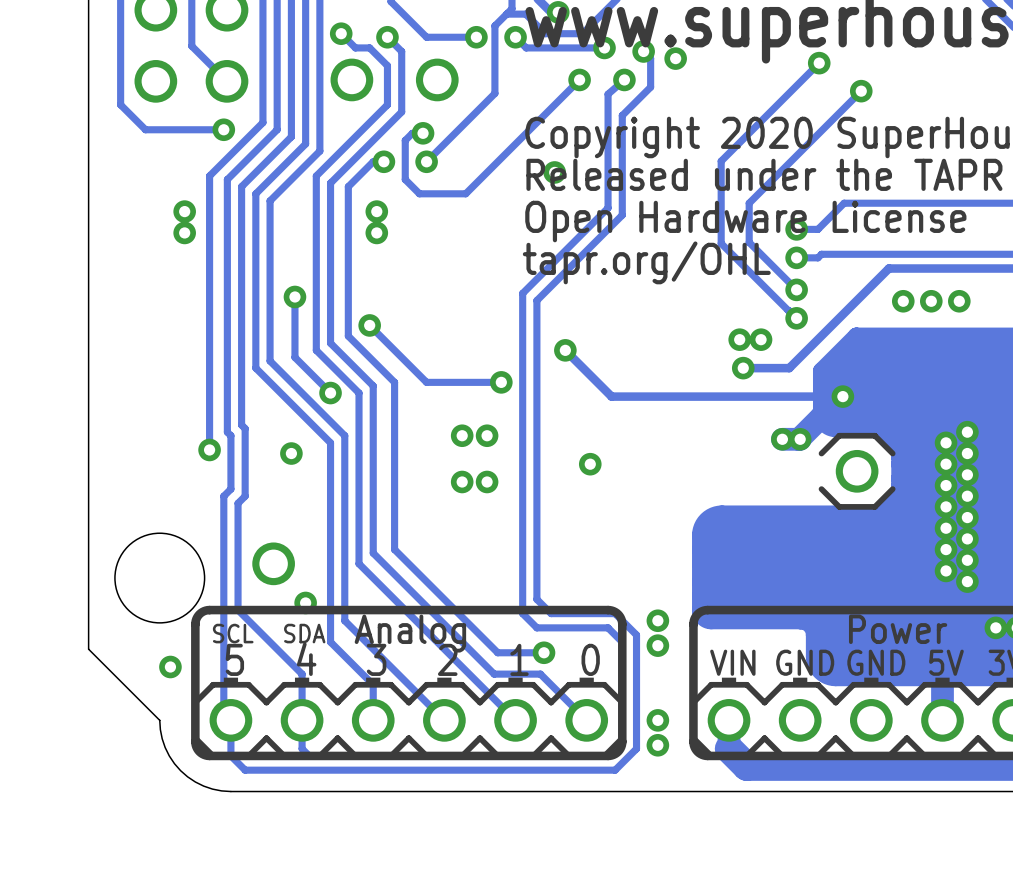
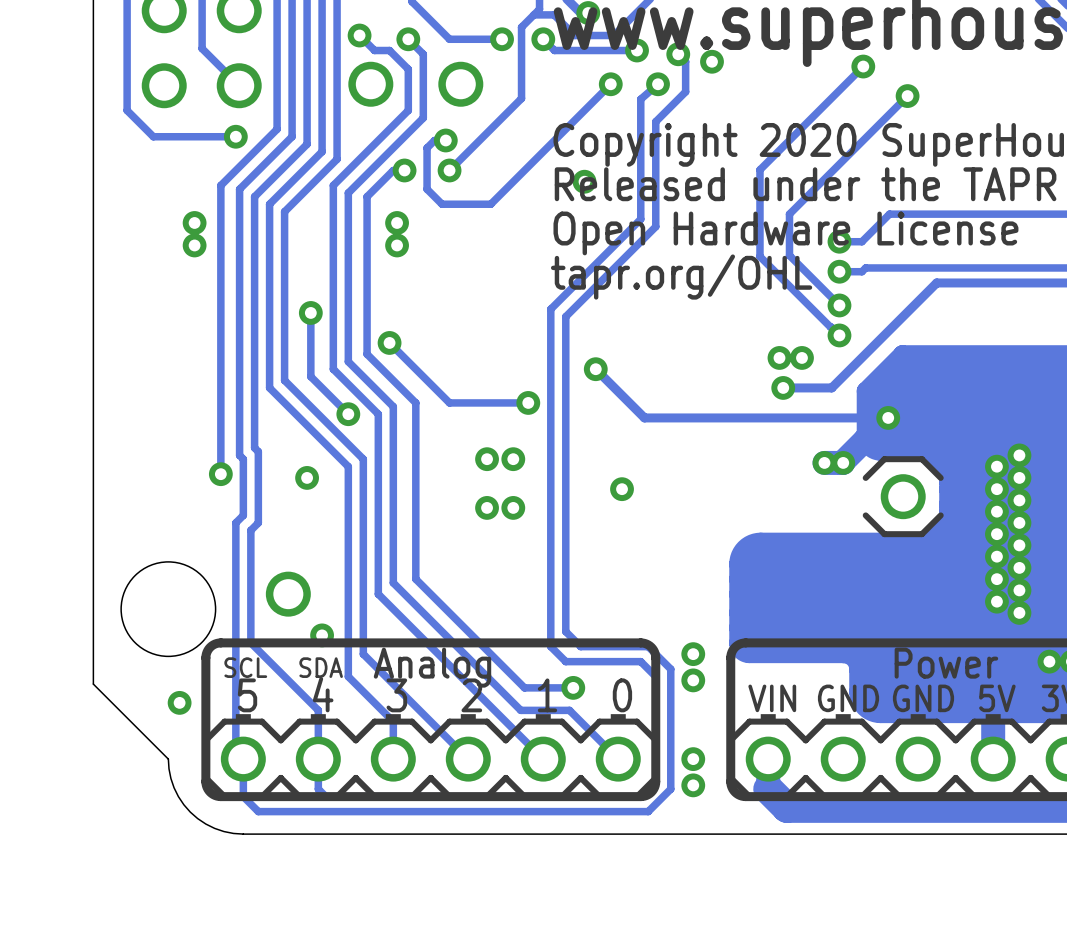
via: (903, 301) -> none
via: (931, 301) -> none
via: (959, 301) -> none

